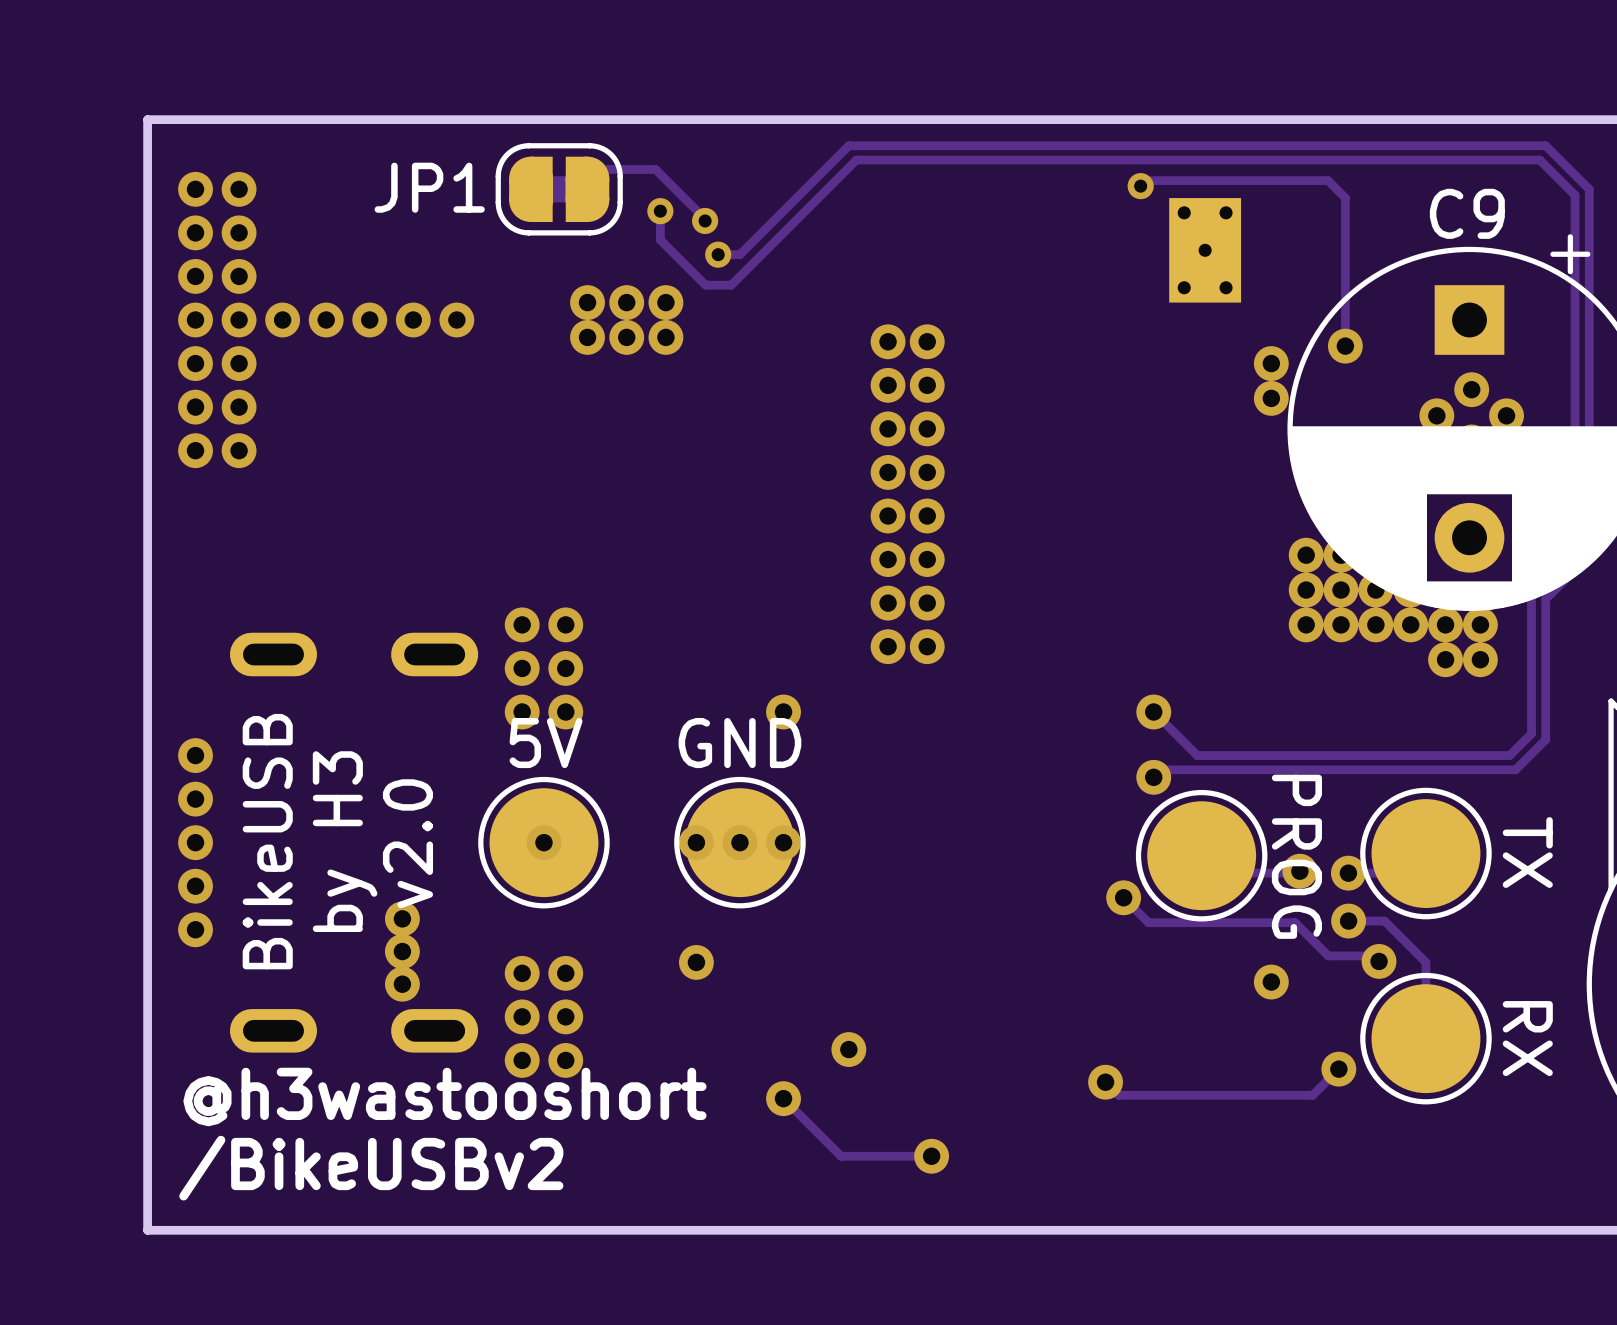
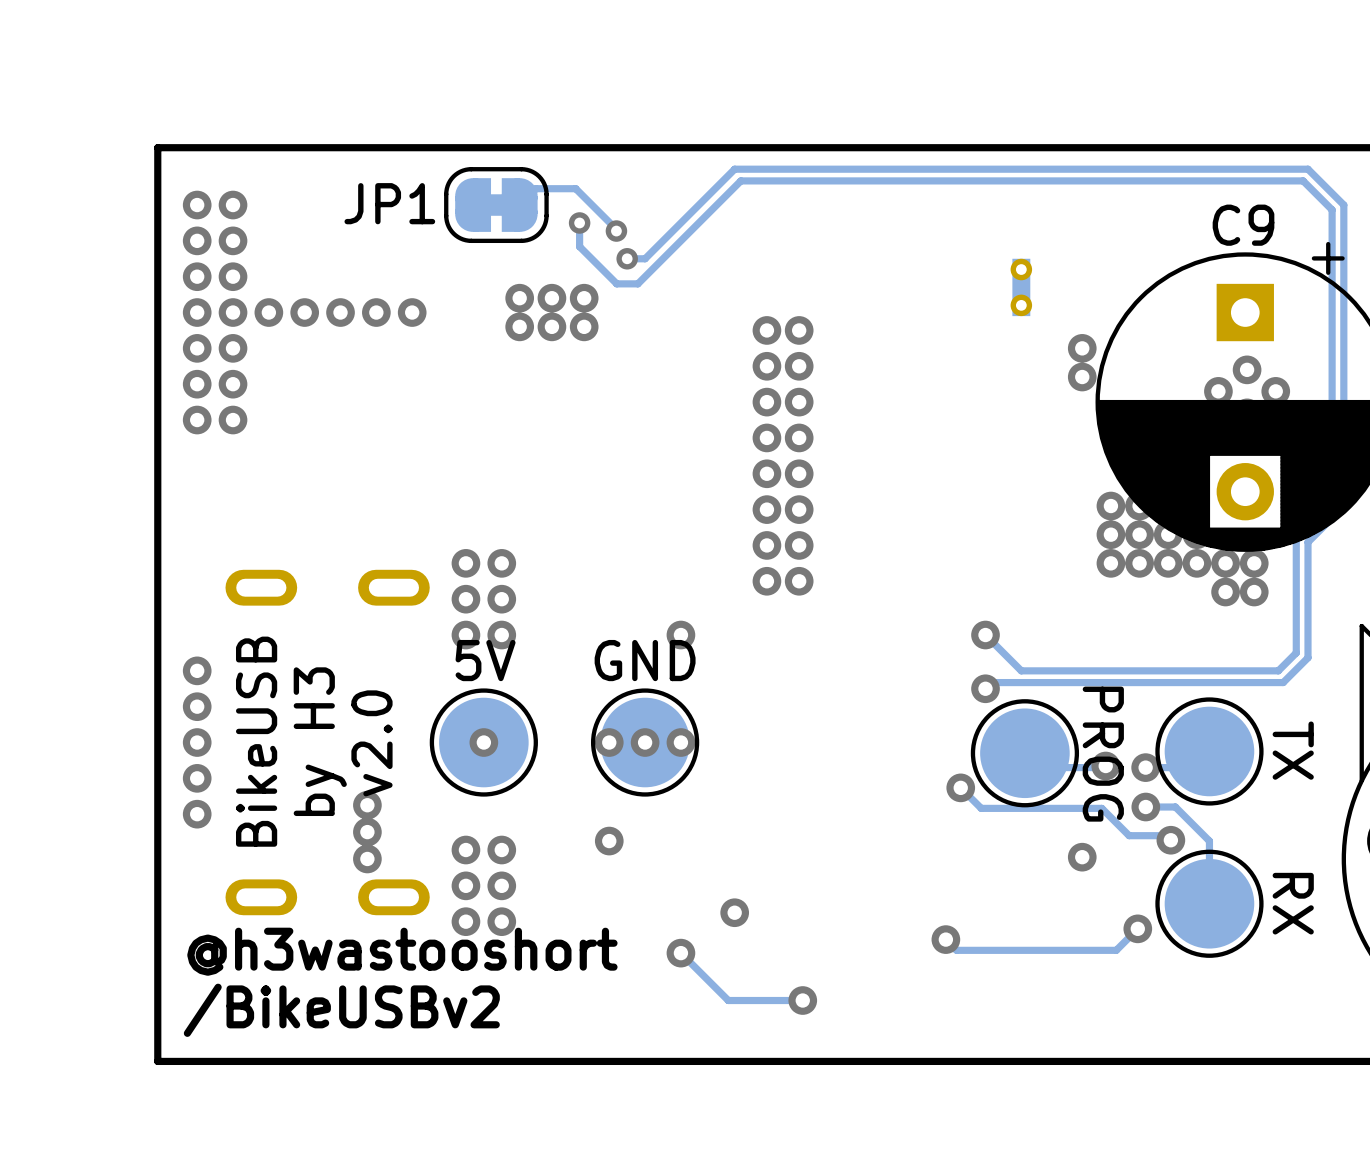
track: (1140, 186) (1146, 180) (1327, 180) (1345, 198) (1345, 346) -> none
via: (1140, 186) -> none
part footprint: [1169, 198, 1242, 303] -> [1010, 258, 1033, 317]
via: (1345, 346) -> none

